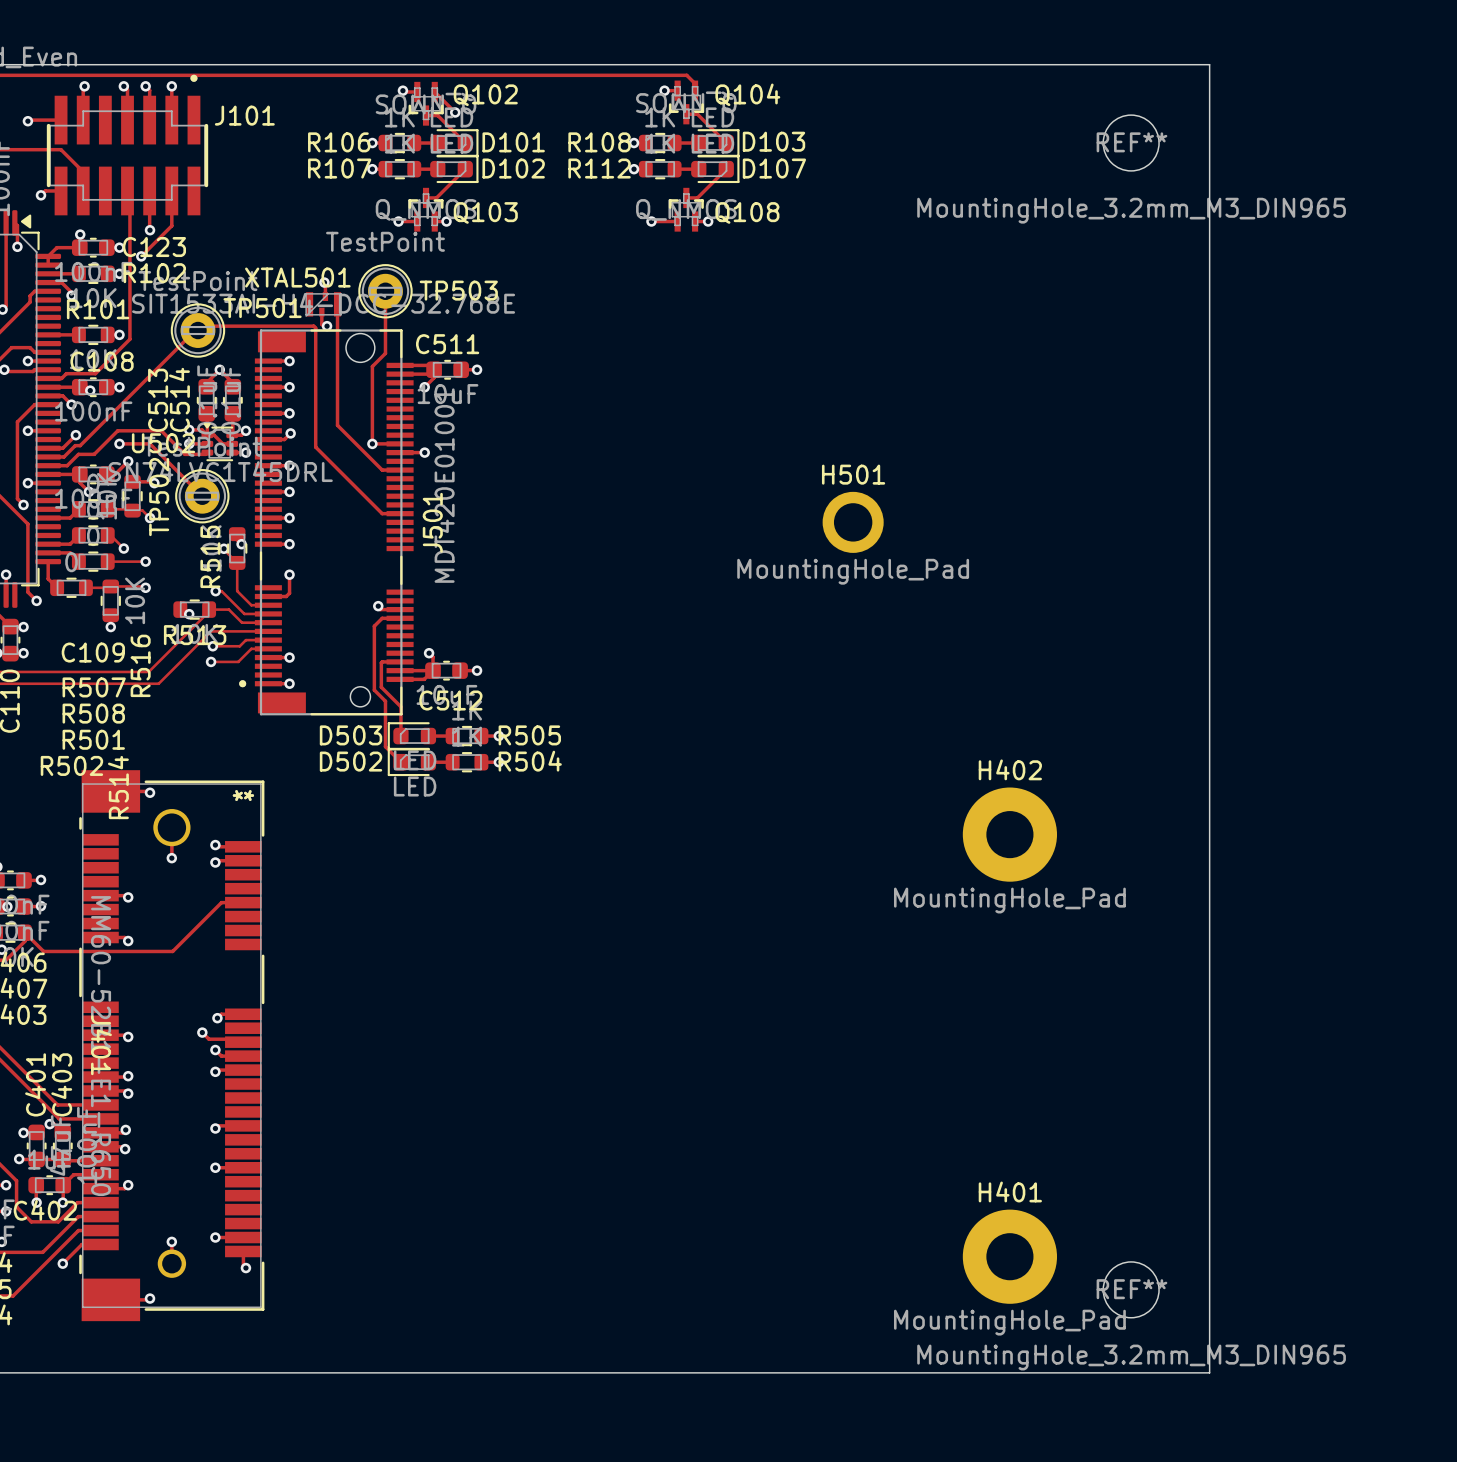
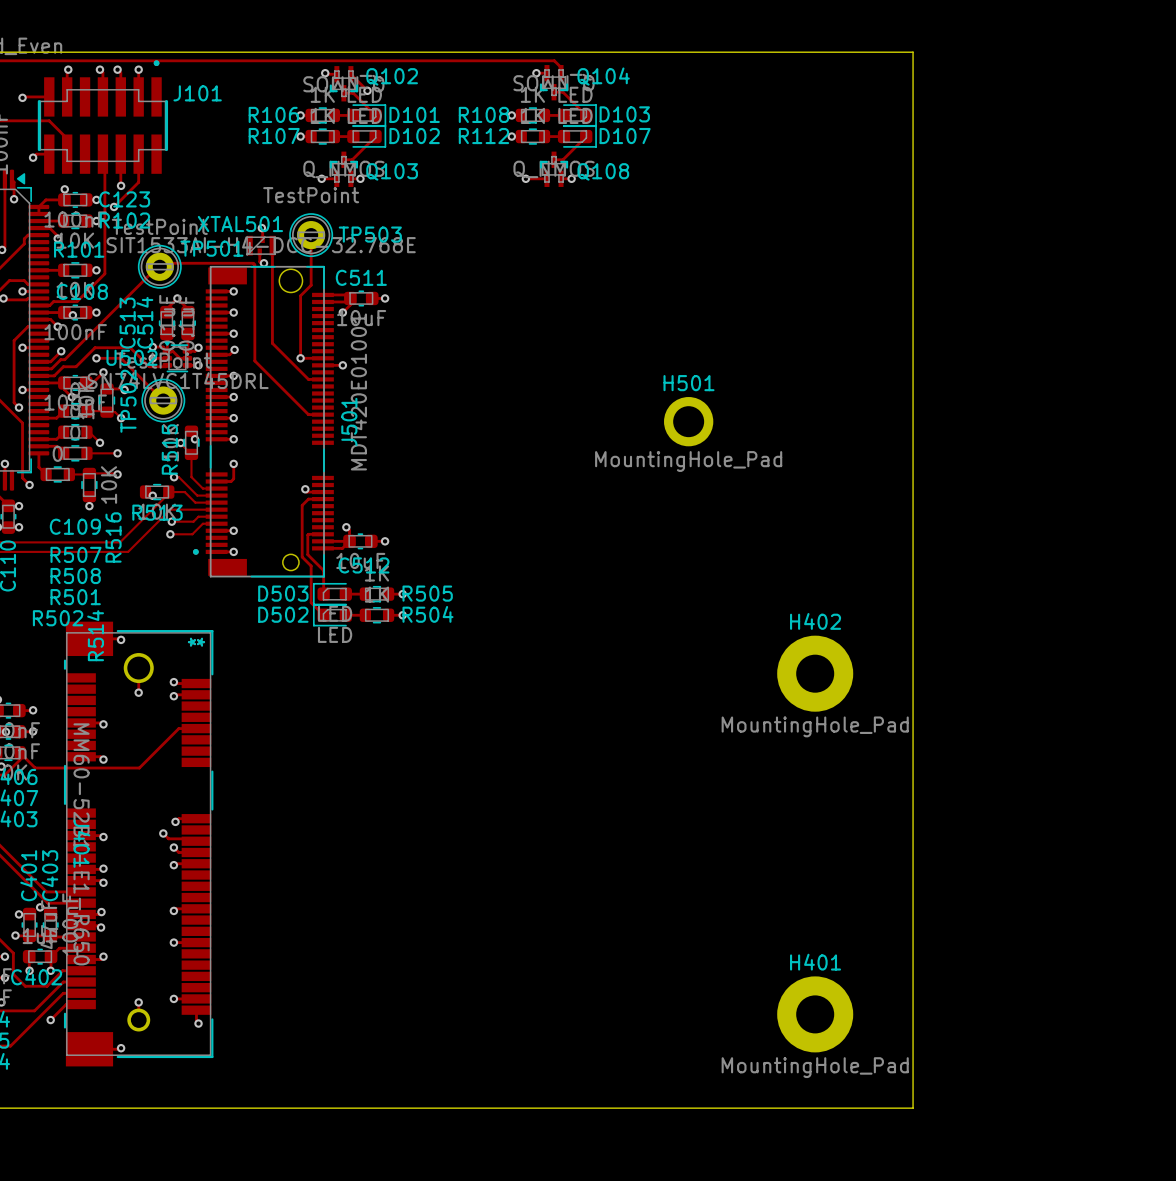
board edge: (1131, 64) (1209, 64) (1209, 1372) (1131, 1372) -> (913, 52) (913, 1108)
REF**: MountingHole_3.2mm_M3_DIN965 (1131, 143) -> none
REF**: MountingHole_3.2mm_M3_DIN965 (1131, 1289) -> none

